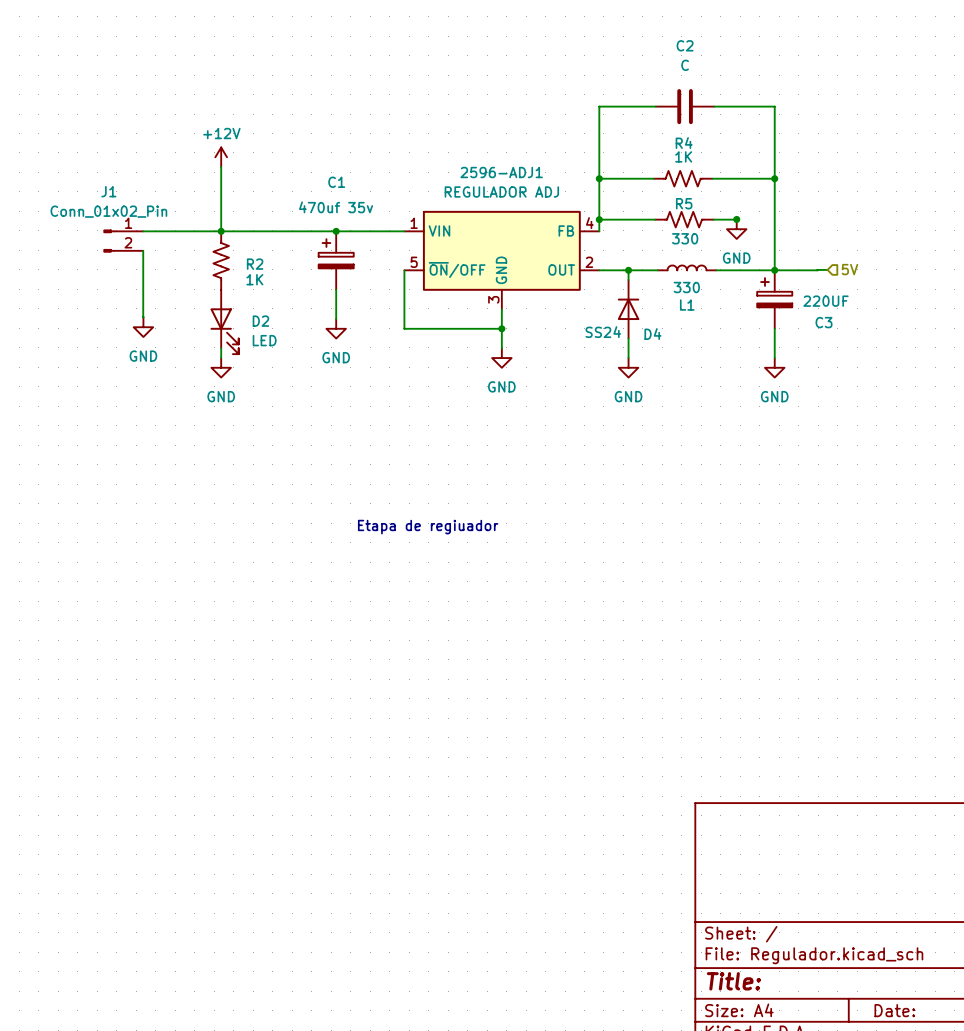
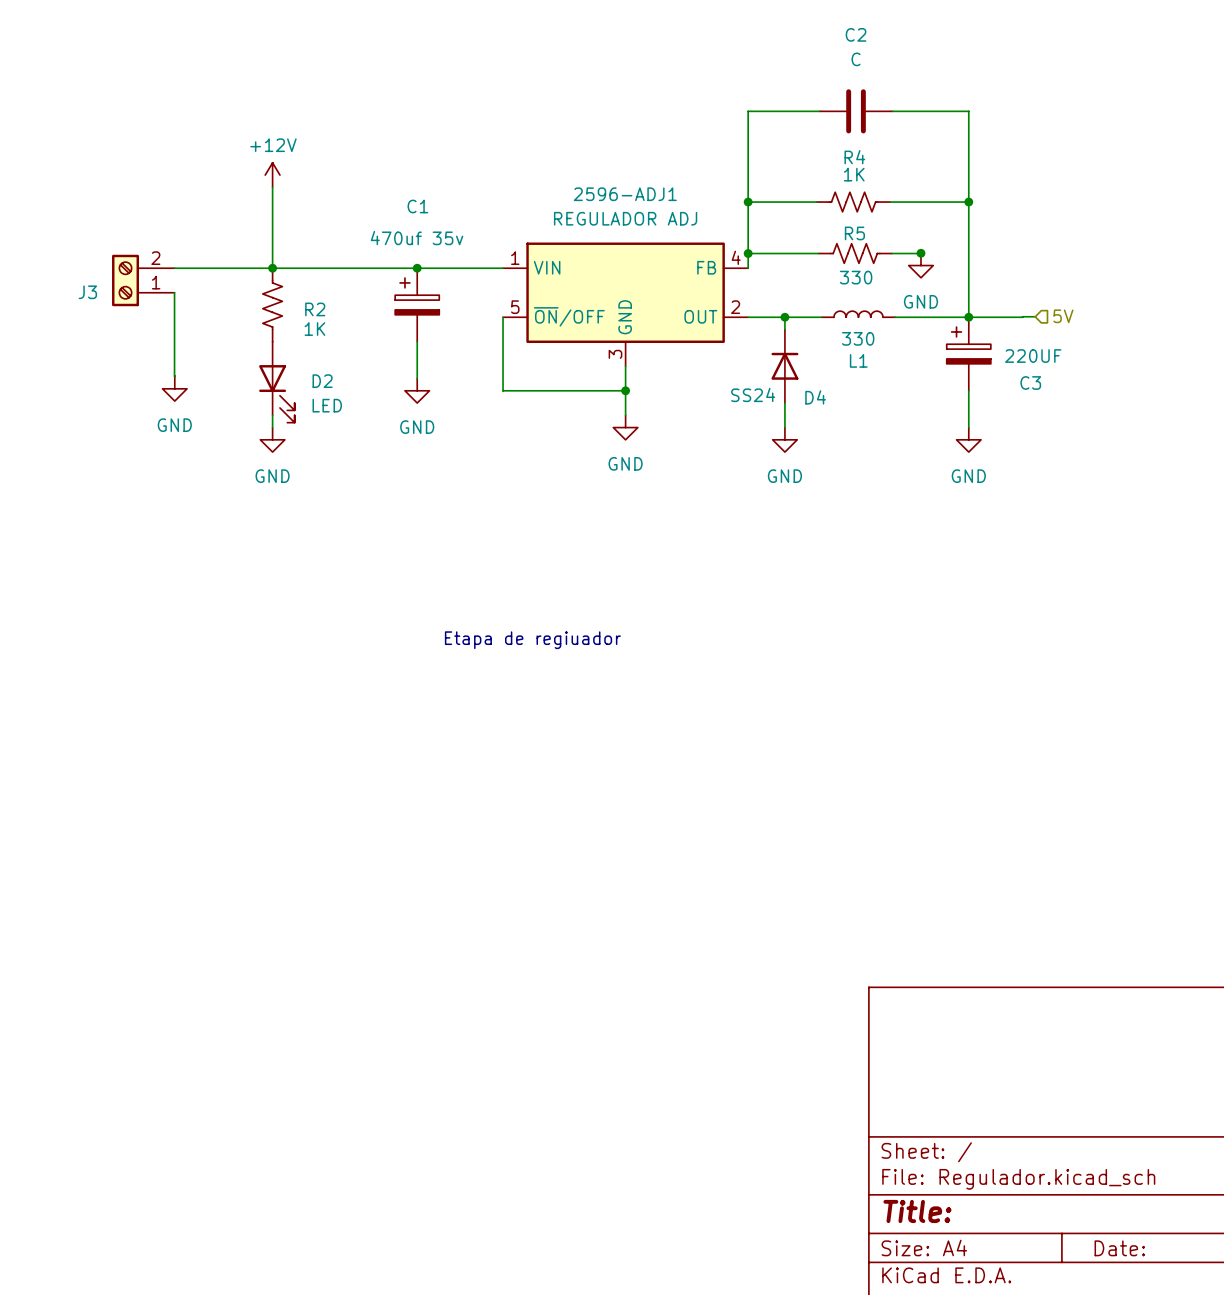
J3: none -> (143, 280)
J1: Conn_01x02_Pin (123, 241) -> none

